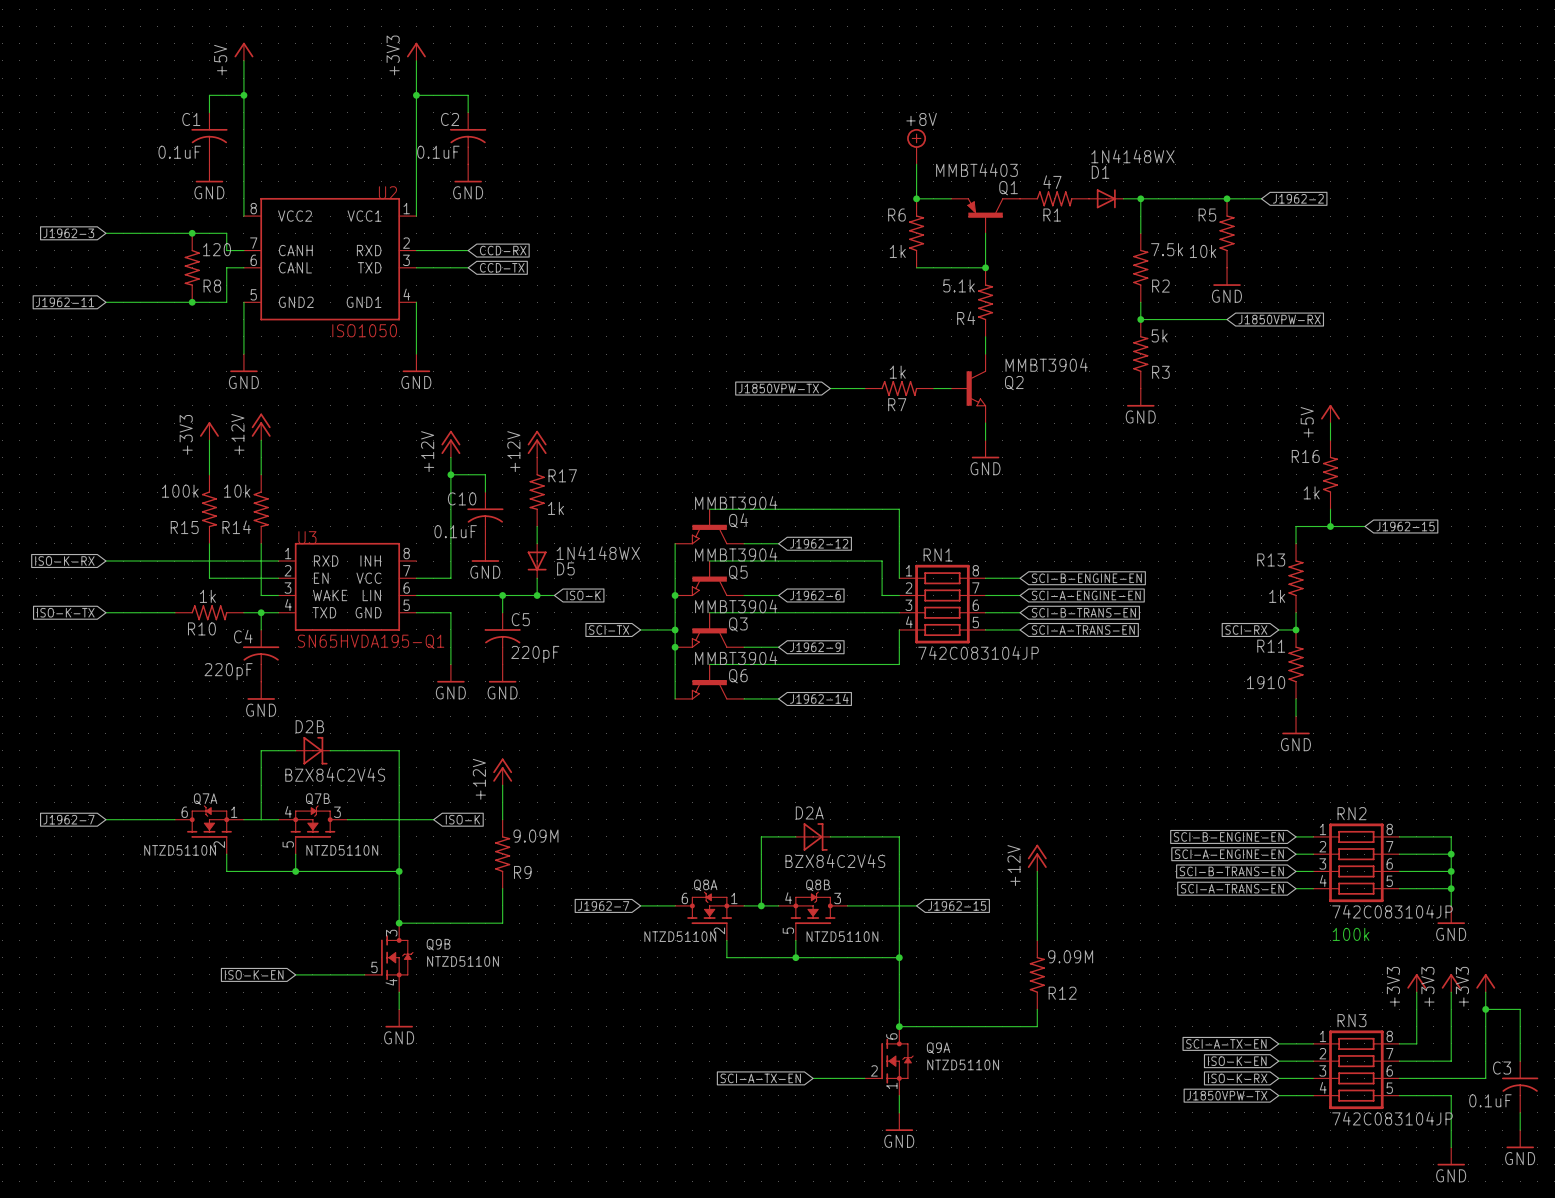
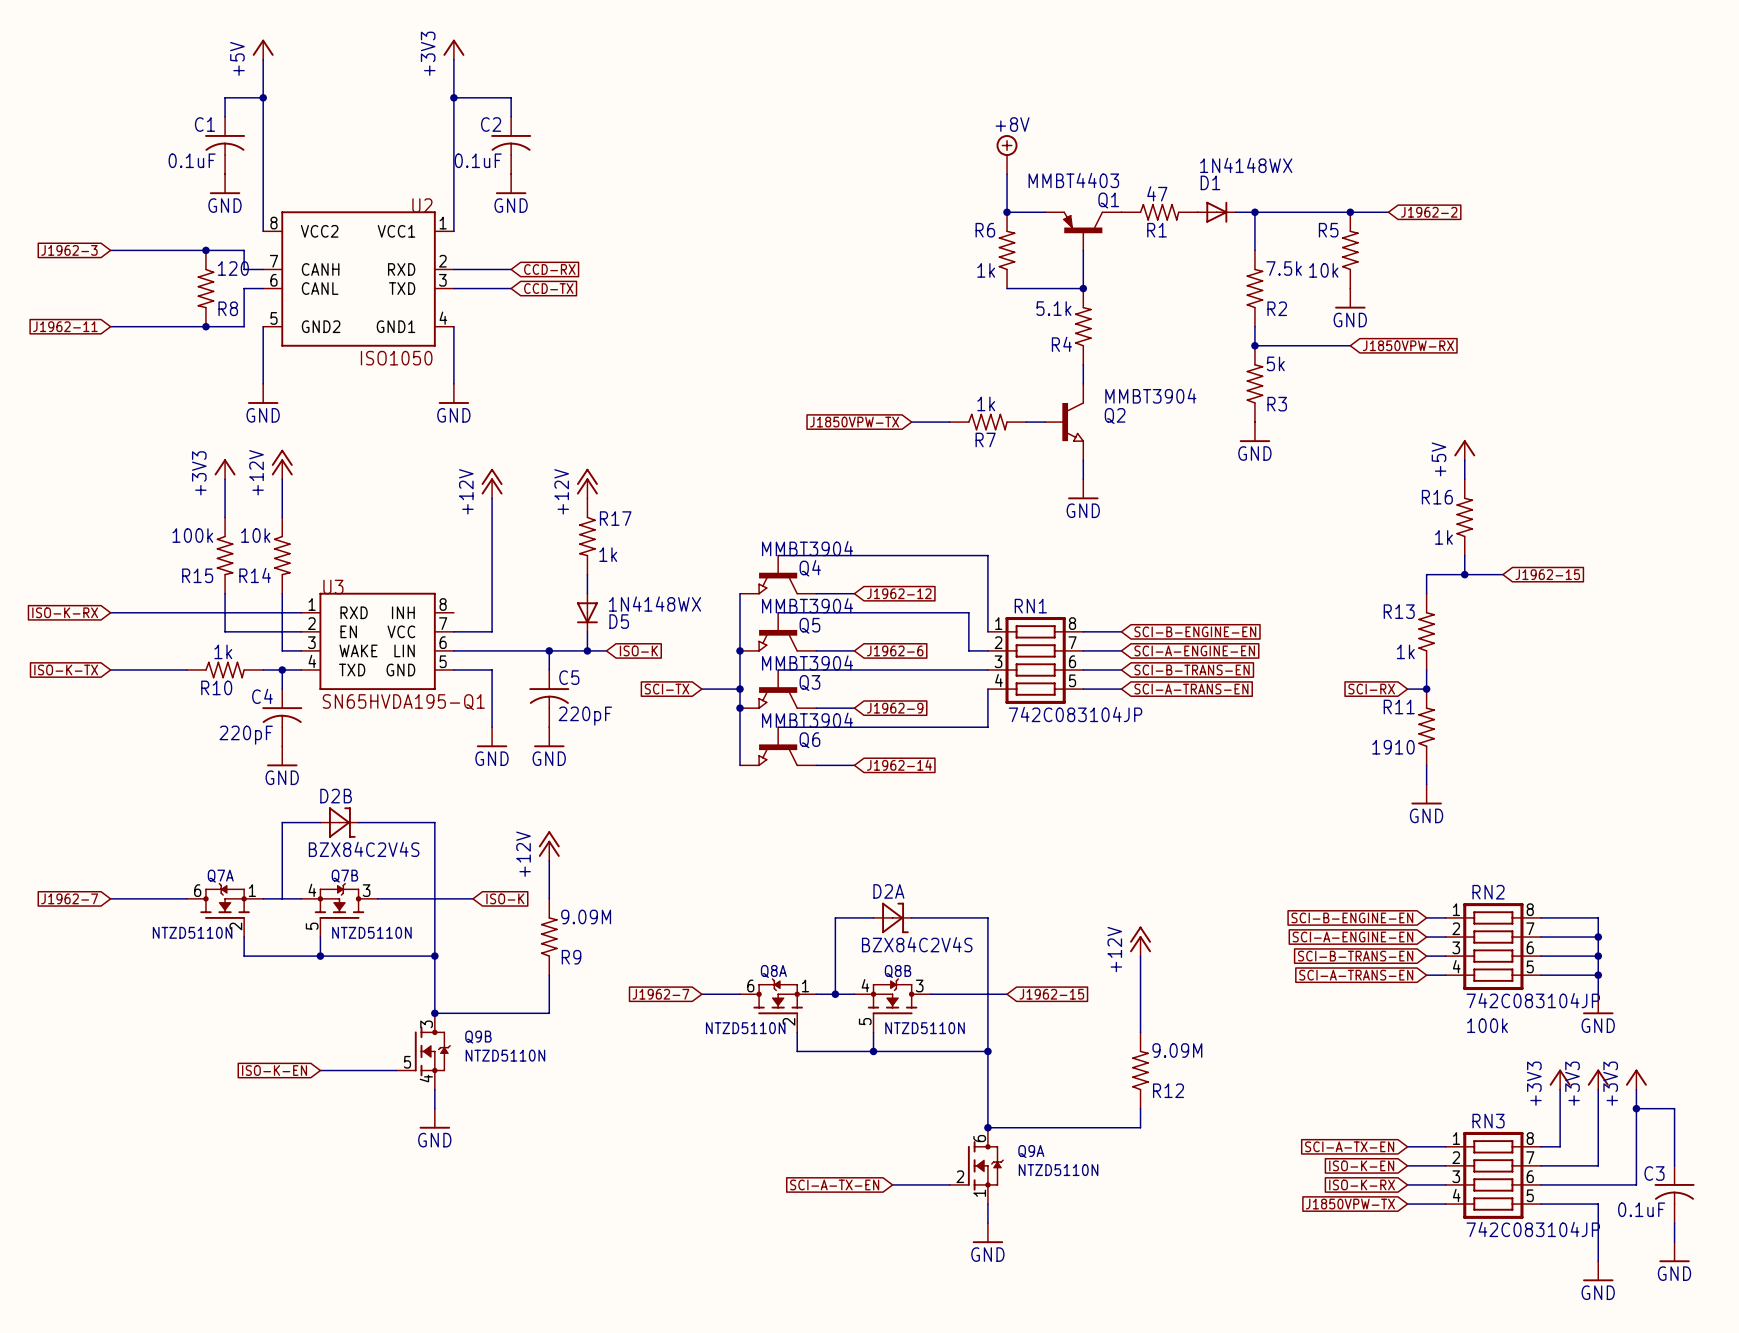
wire: (450, 474) (485, 474) (485, 492) -> none
junction: (450, 474) -> none
C10: 0.1uF (485, 517) -> none
power symbol: GND (485, 552) -> none

